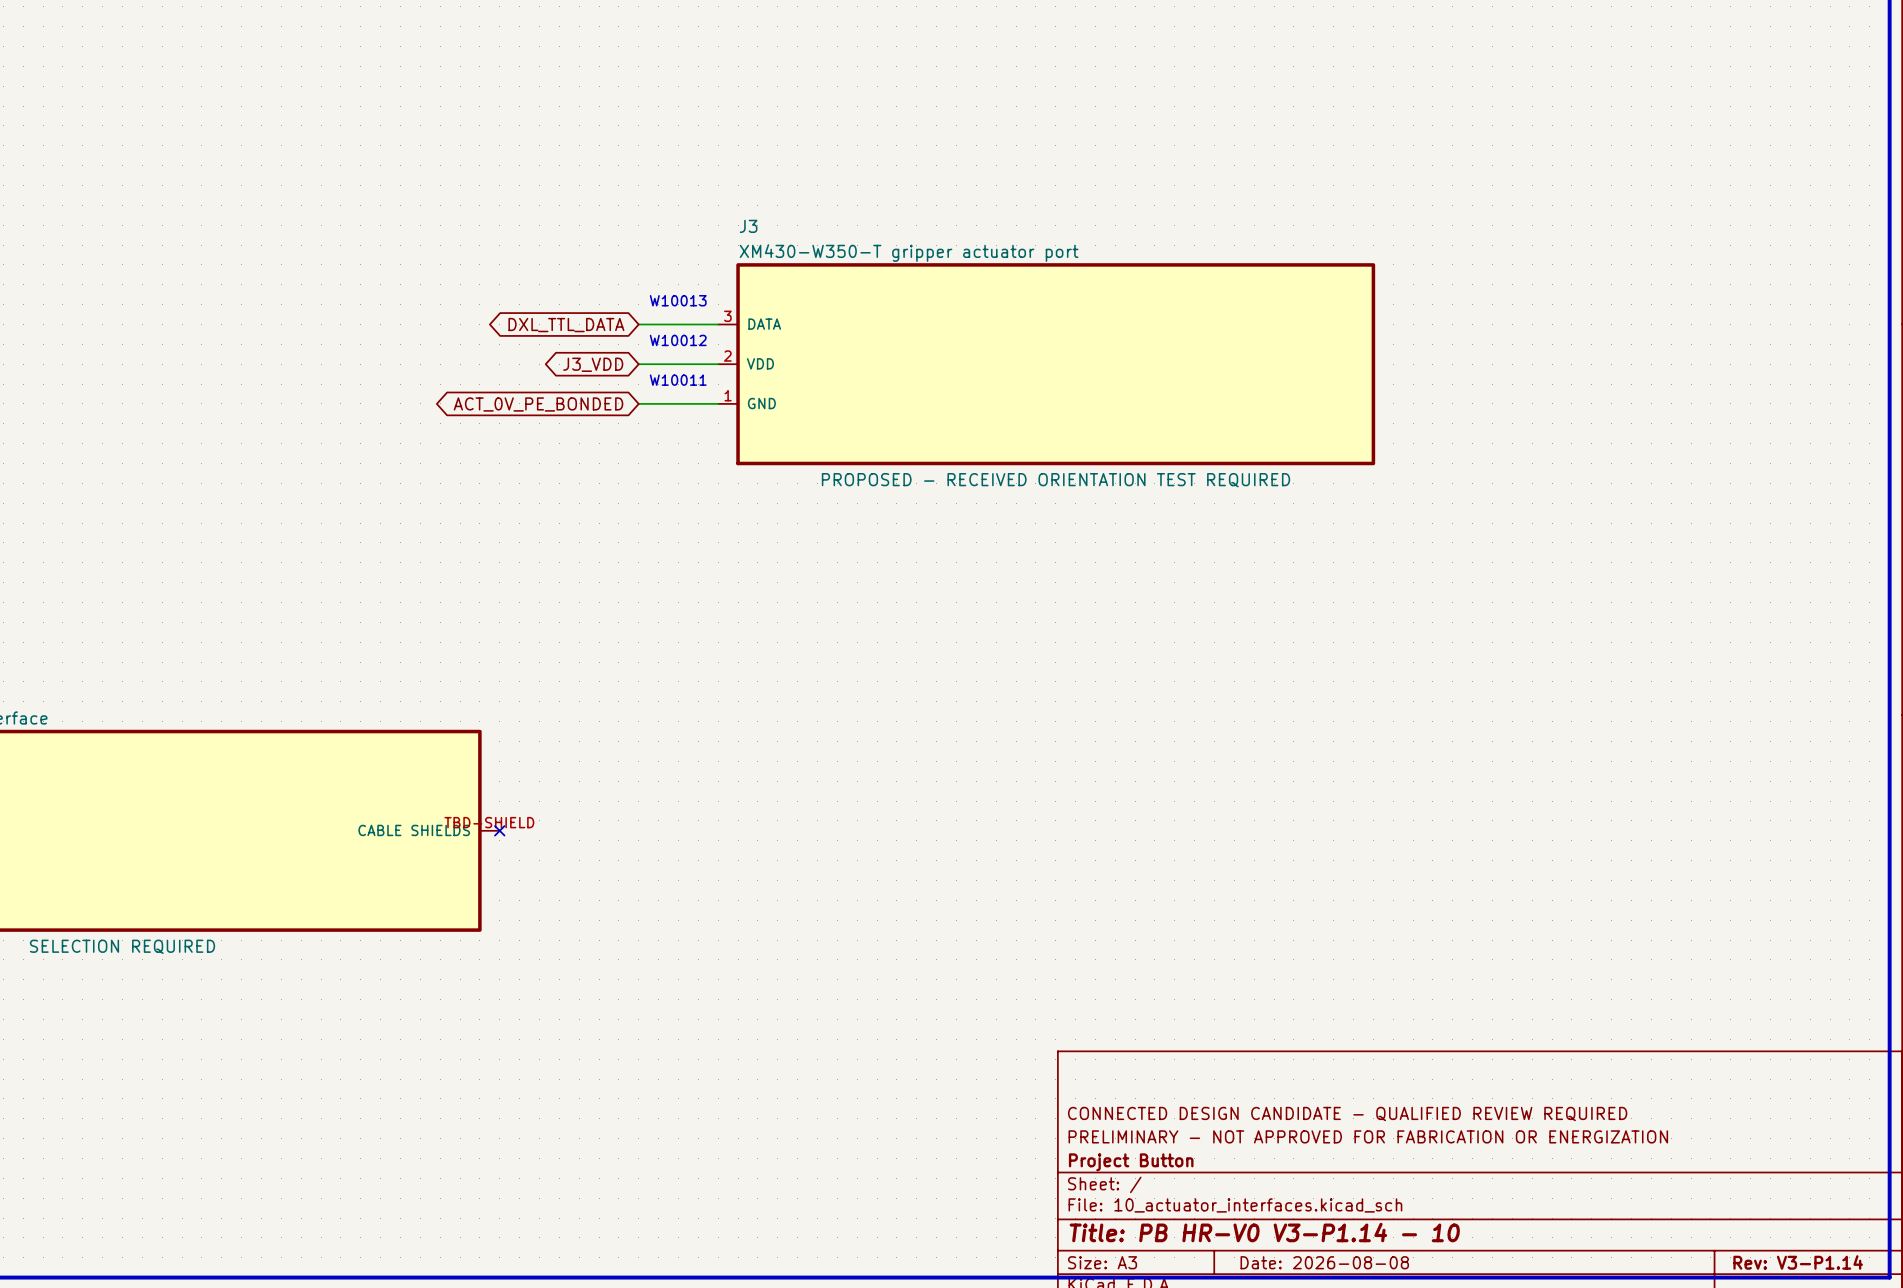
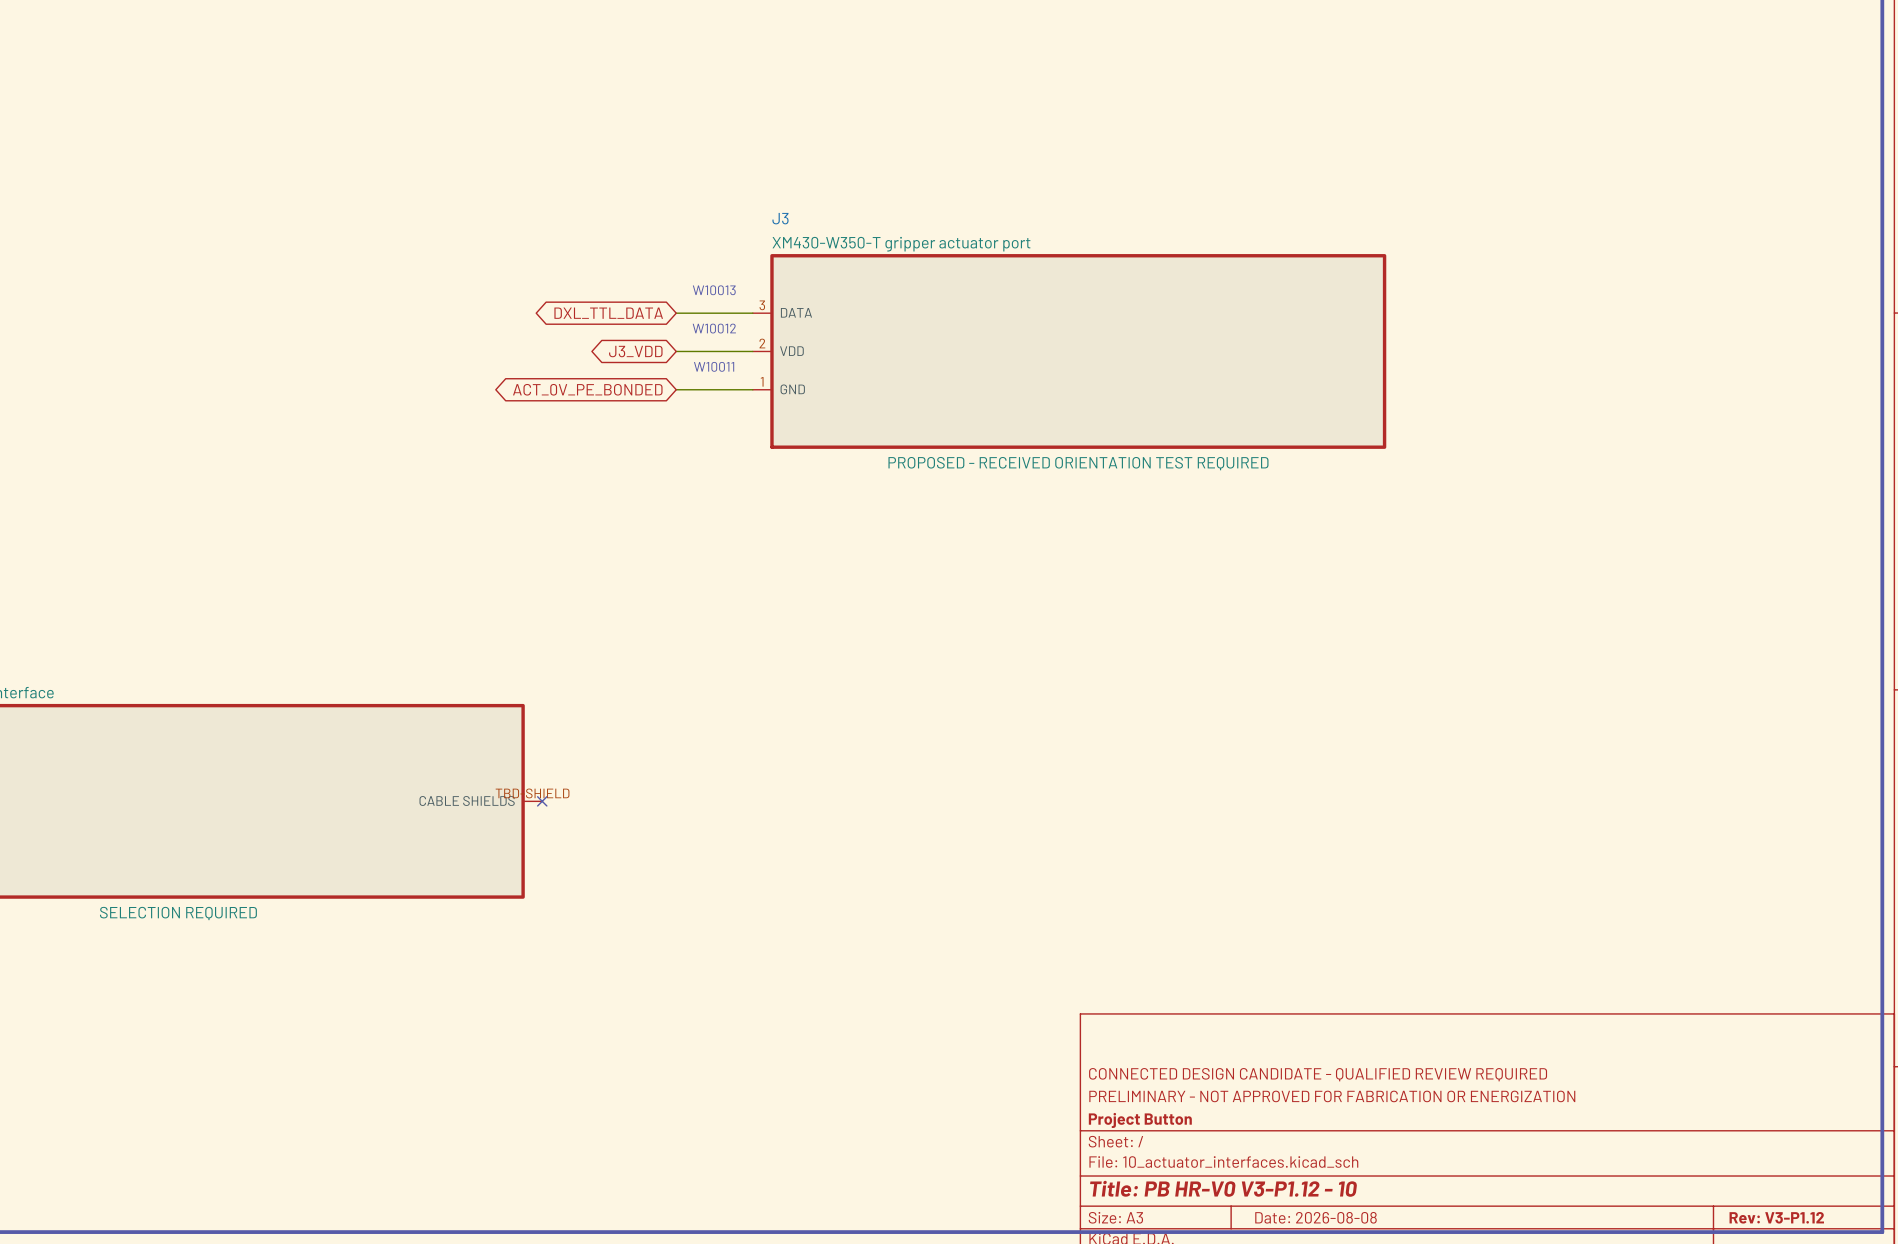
title block: Title: PB HR-V0 V3-P1.14 - 10 (1264, 1232) -> Title: PB HR-V0 V3-P1.12 - 10 (1223, 1188)
title block: Rev: V3-P1.14 (1798, 1262) -> Rev: V3-P1.12 (1776, 1217)

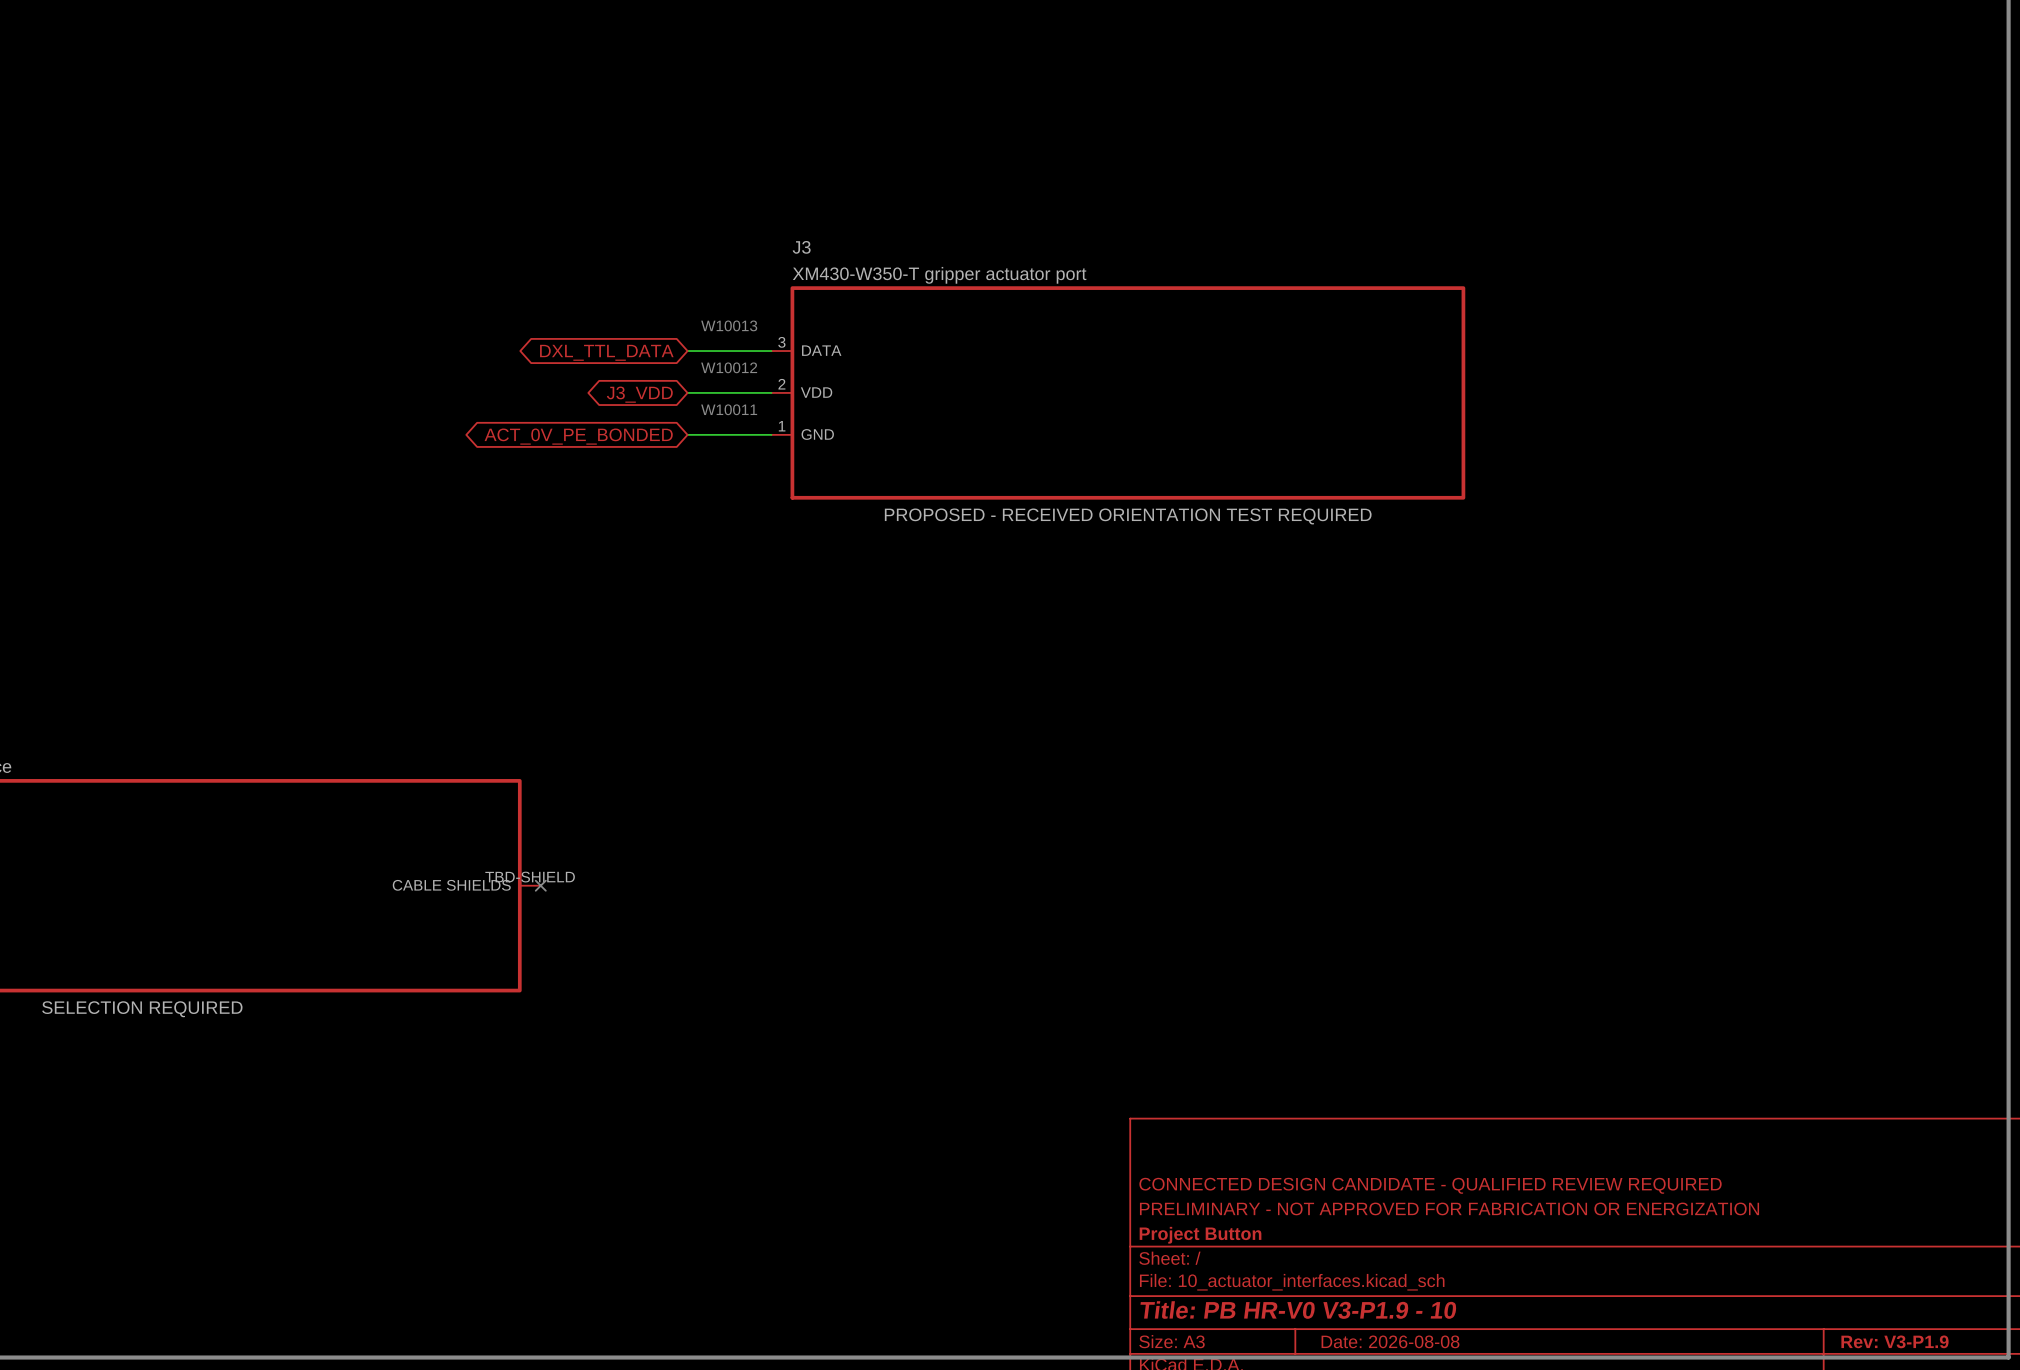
title block: Title: PB HR-V0 V3-P1.12 - 10 (1223, 1188) -> Title: PB HR-V0 V3-P1.9 - 10 (1298, 1310)
title block: Rev: V3-P1.12 (1776, 1217) -> Rev: V3-P1.9 (1894, 1341)

